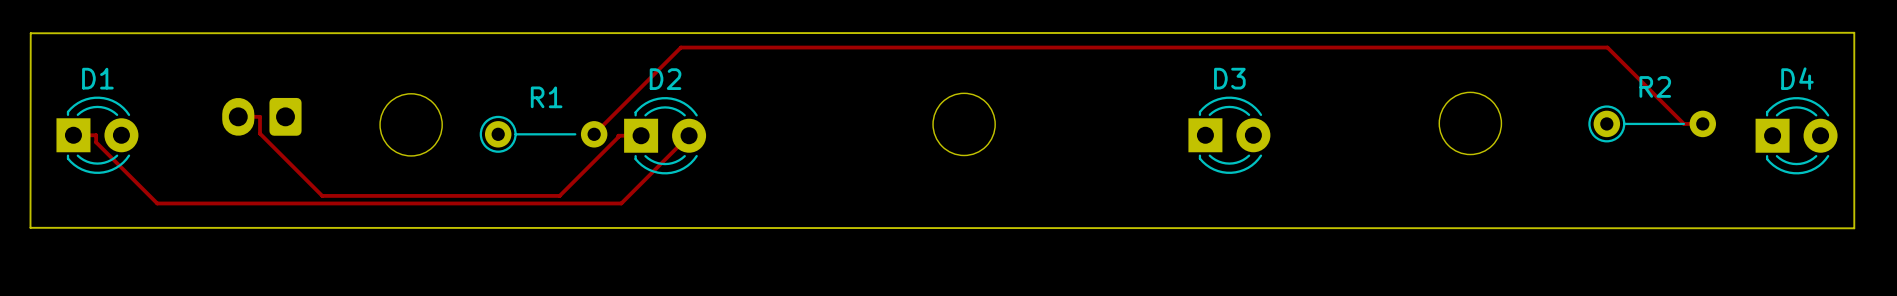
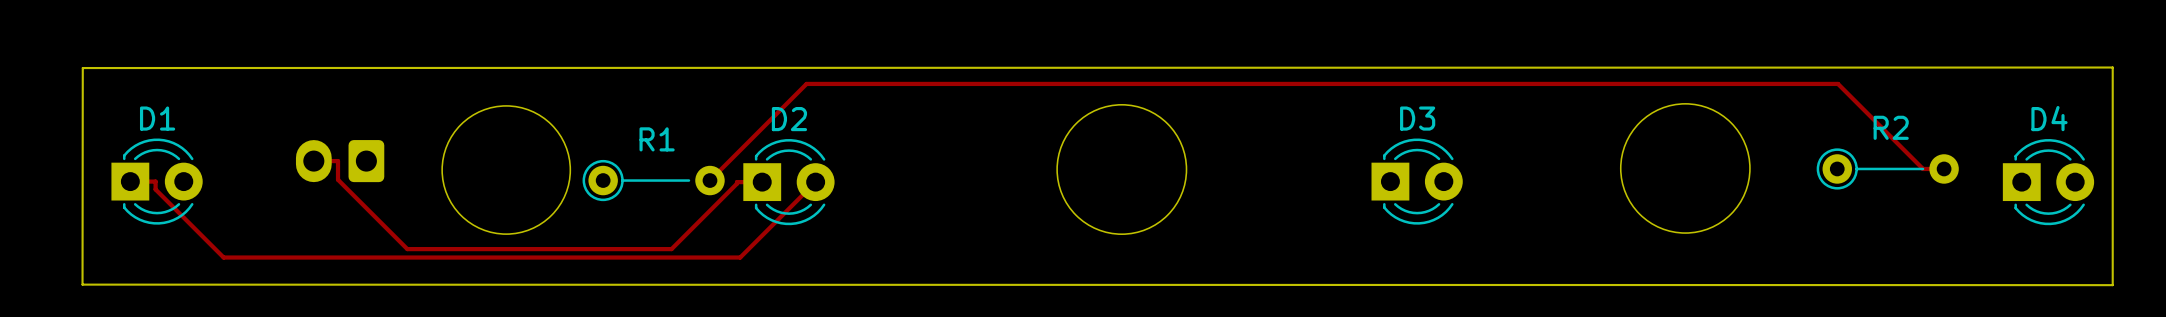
round board edge size: [1438, 91, 1502, 156] -> [1620, 103, 1751, 234]
round board edge size: [932, 92, 996, 156] -> [1056, 104, 1188, 235]
round board edge size: [379, 93, 443, 157] -> [441, 105, 571, 235]

